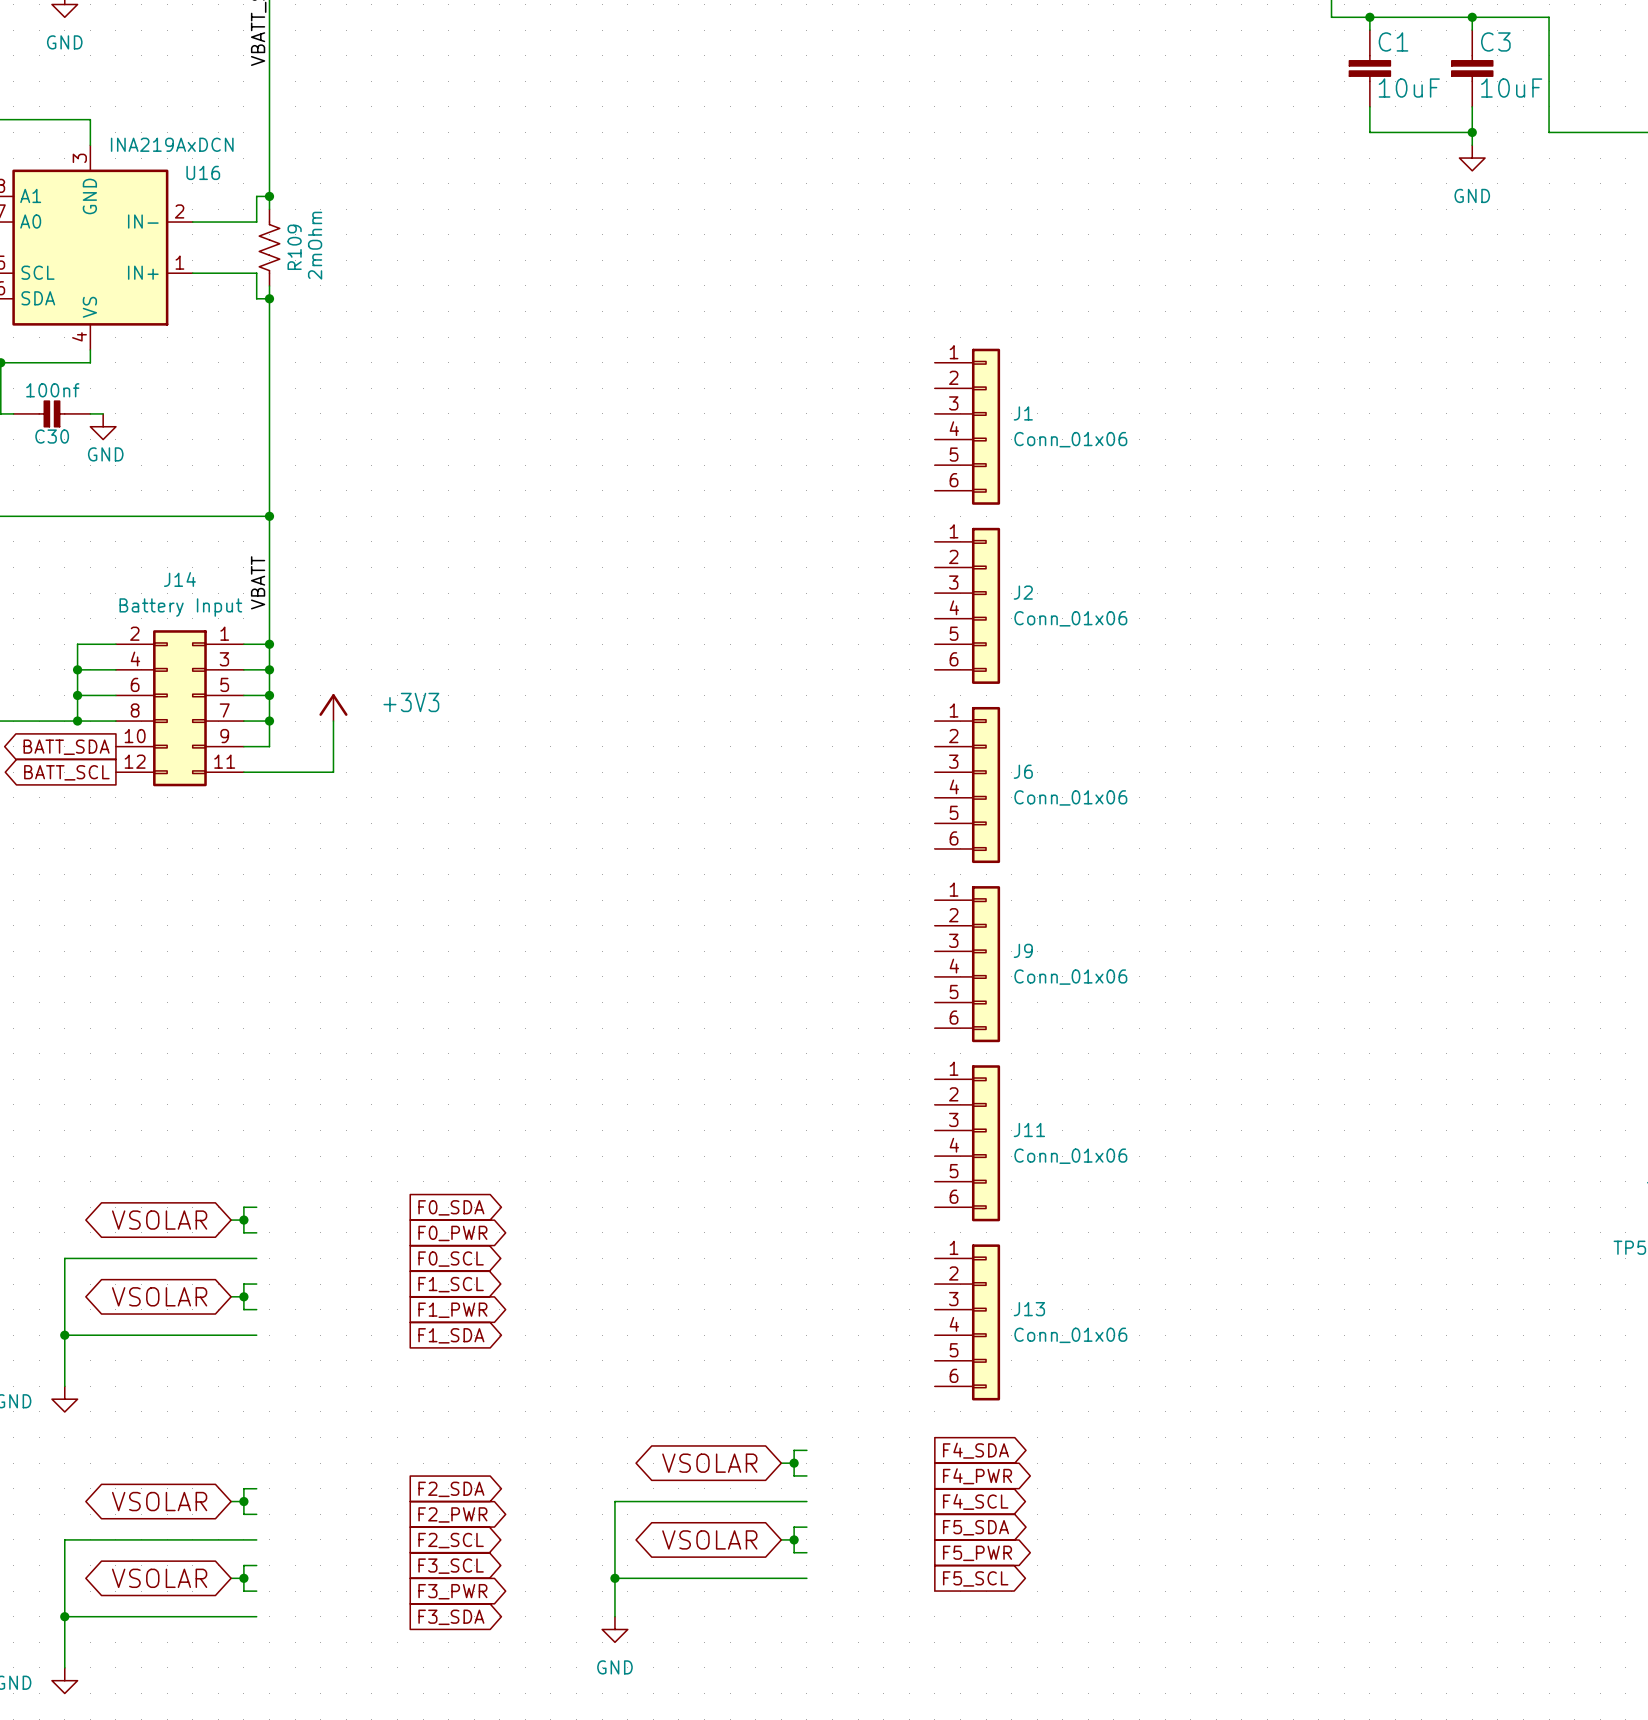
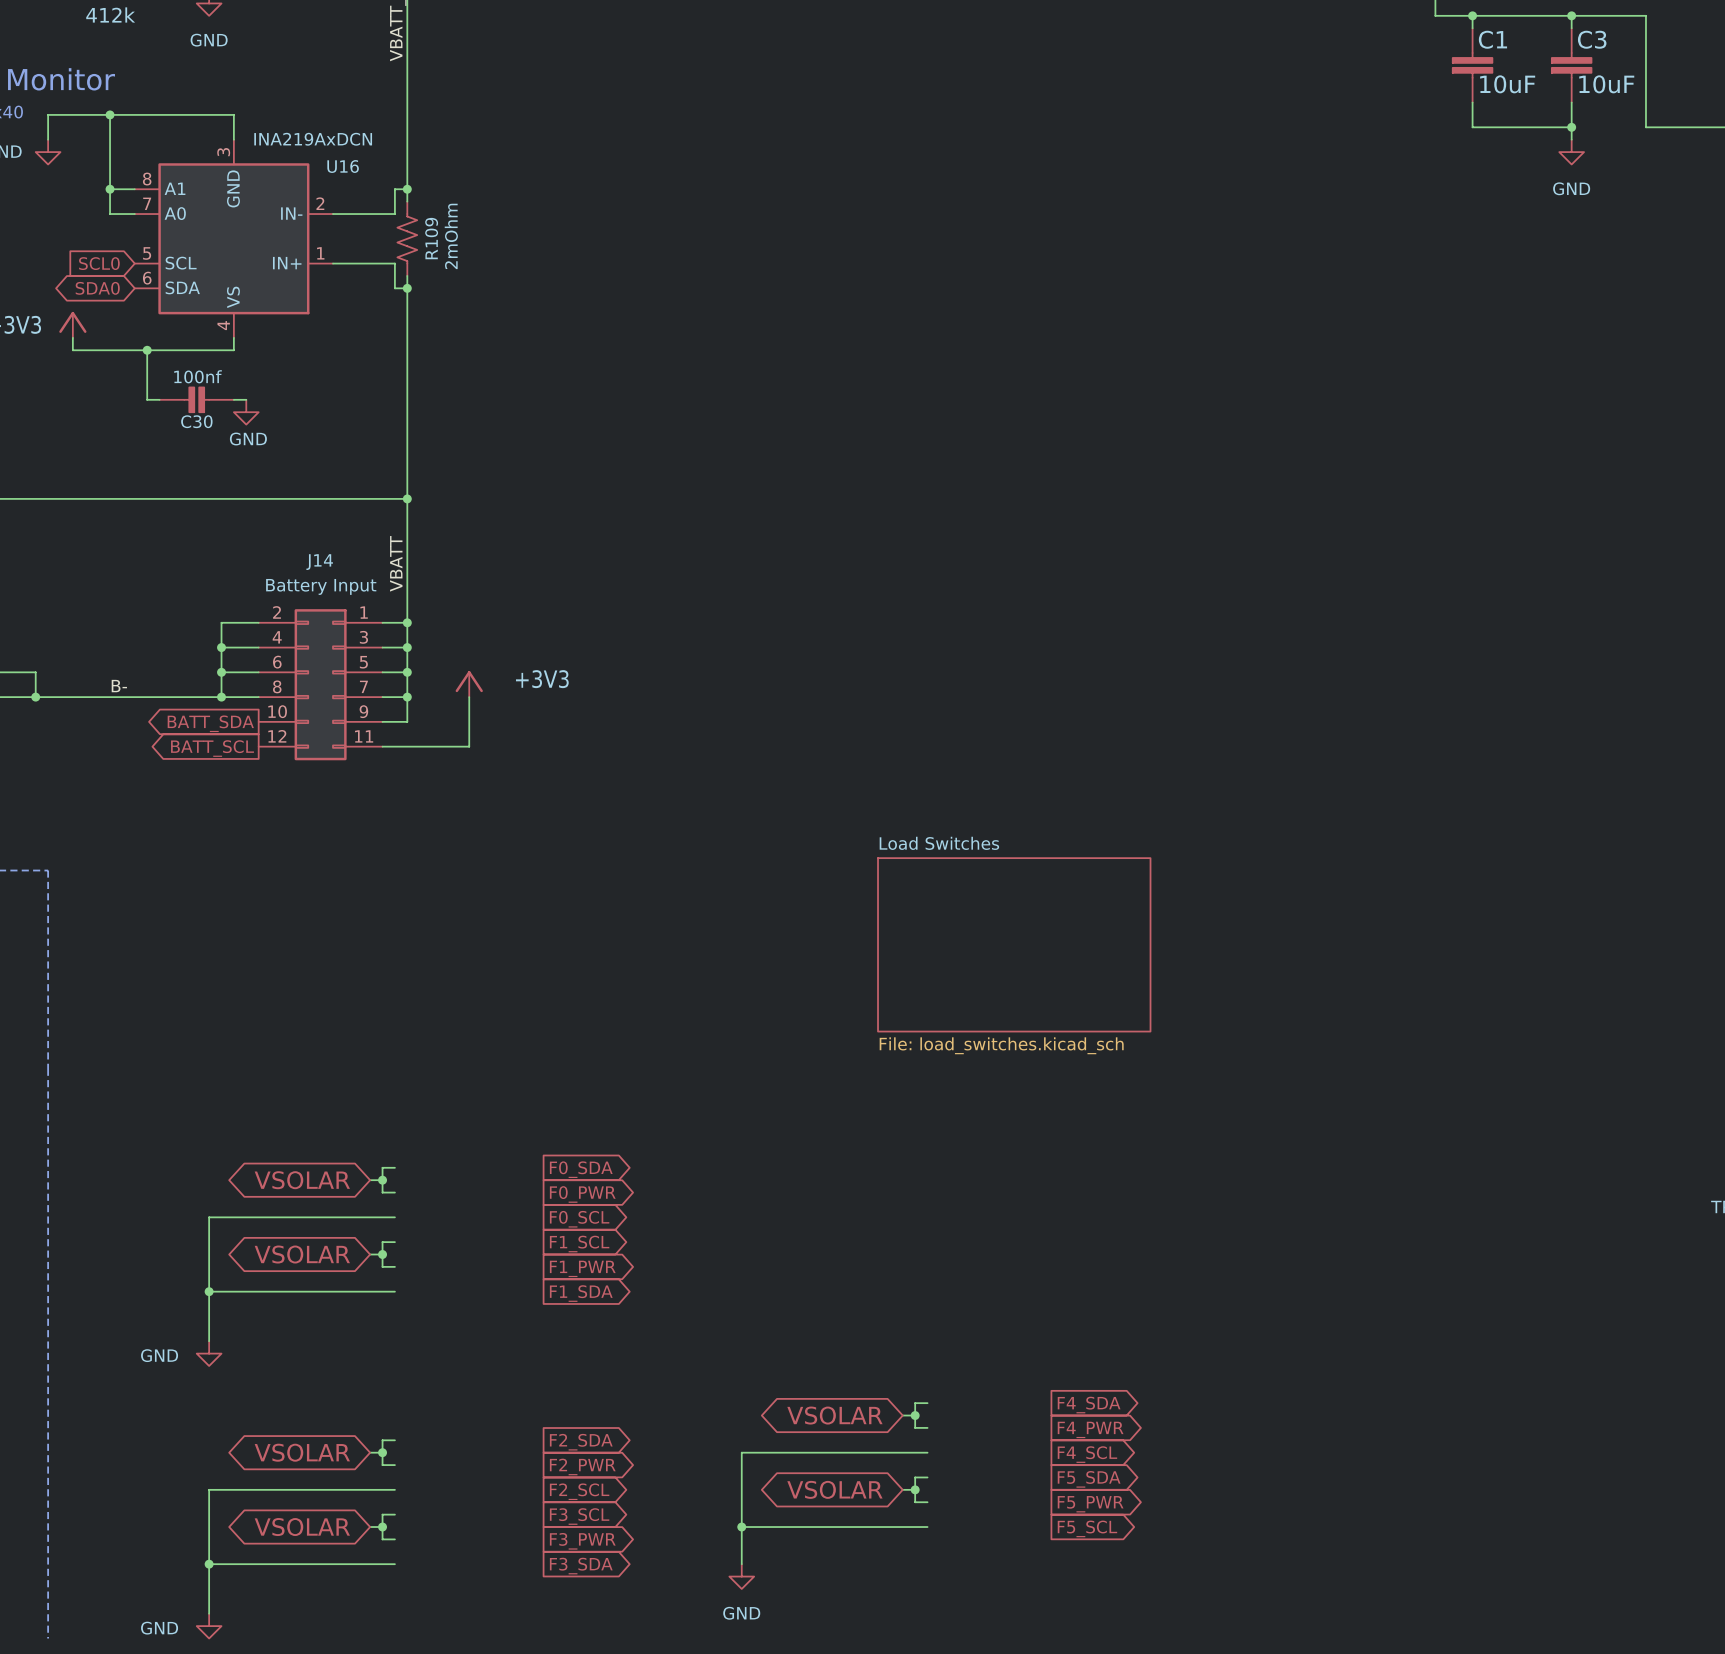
J1: Conn_01x06 (967, 426) -> none
J2: Conn_01x06 (967, 605) -> none
J6: Conn_01x06 (967, 785) -> none
J9: Conn_01x06 (967, 964) -> none
sheet Load Switches: none -> File: load_switches.kicad_sch (1014, 944)
J11: Conn_01x06 (967, 1143) -> none
J13: Conn_01x06 (967, 1322) -> none

